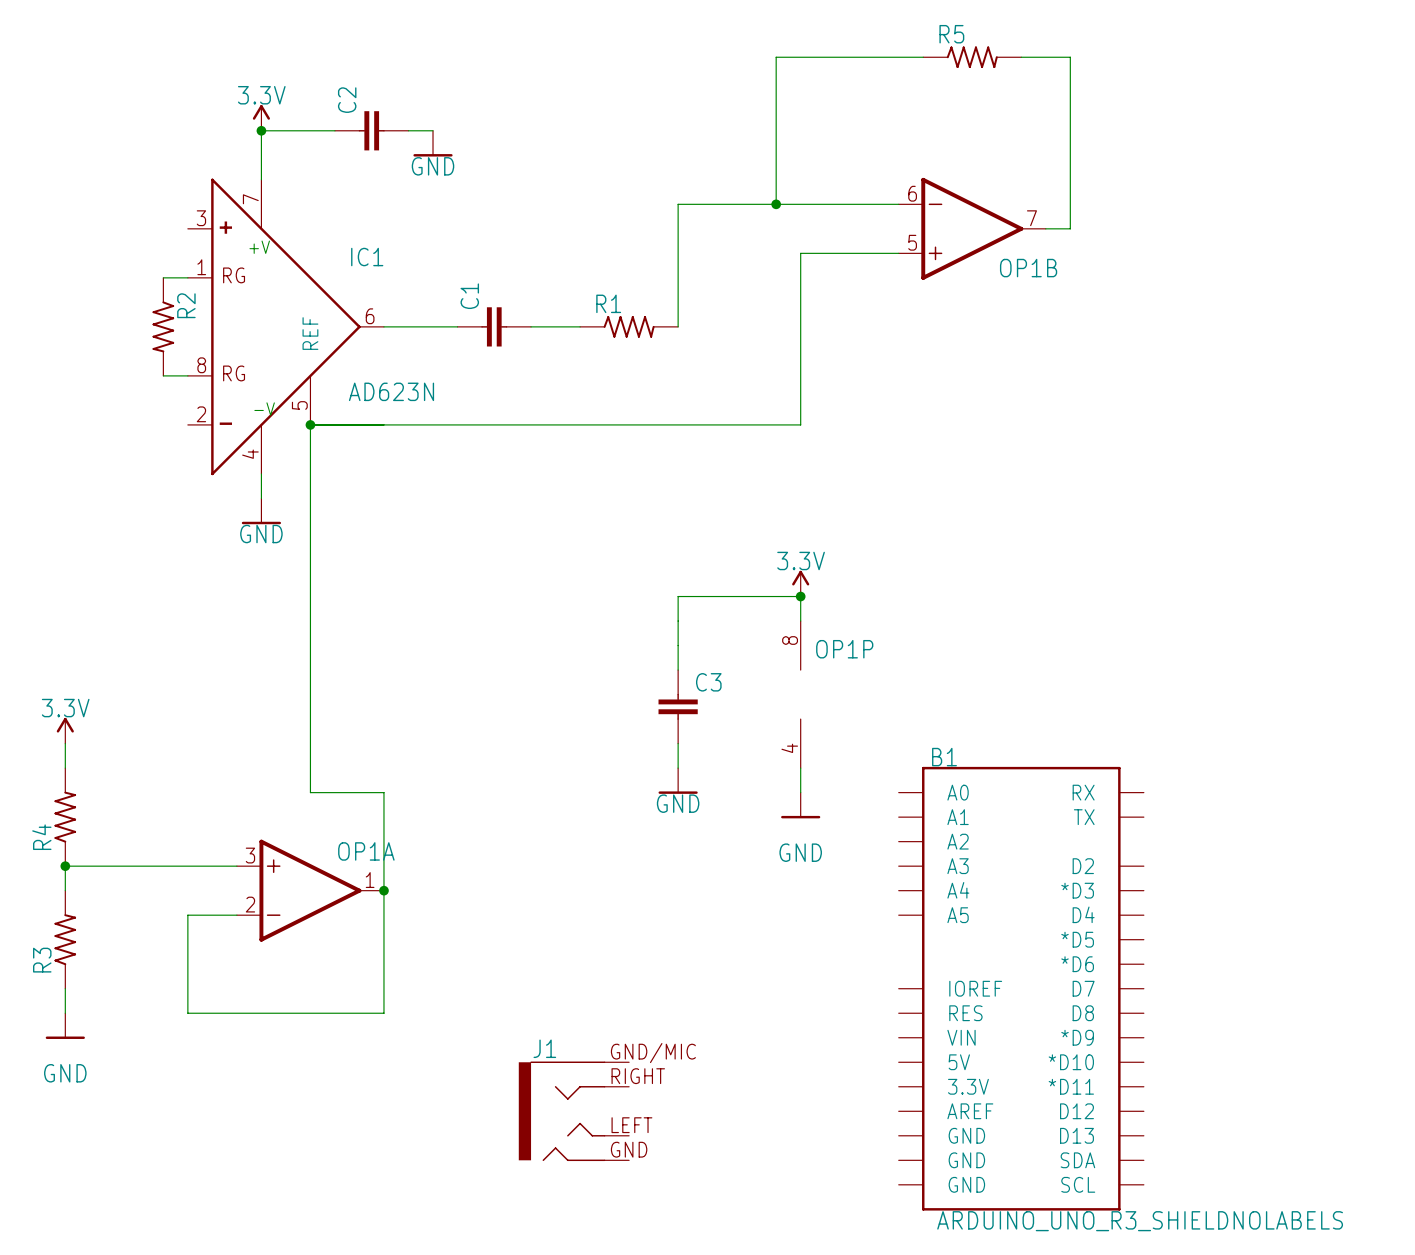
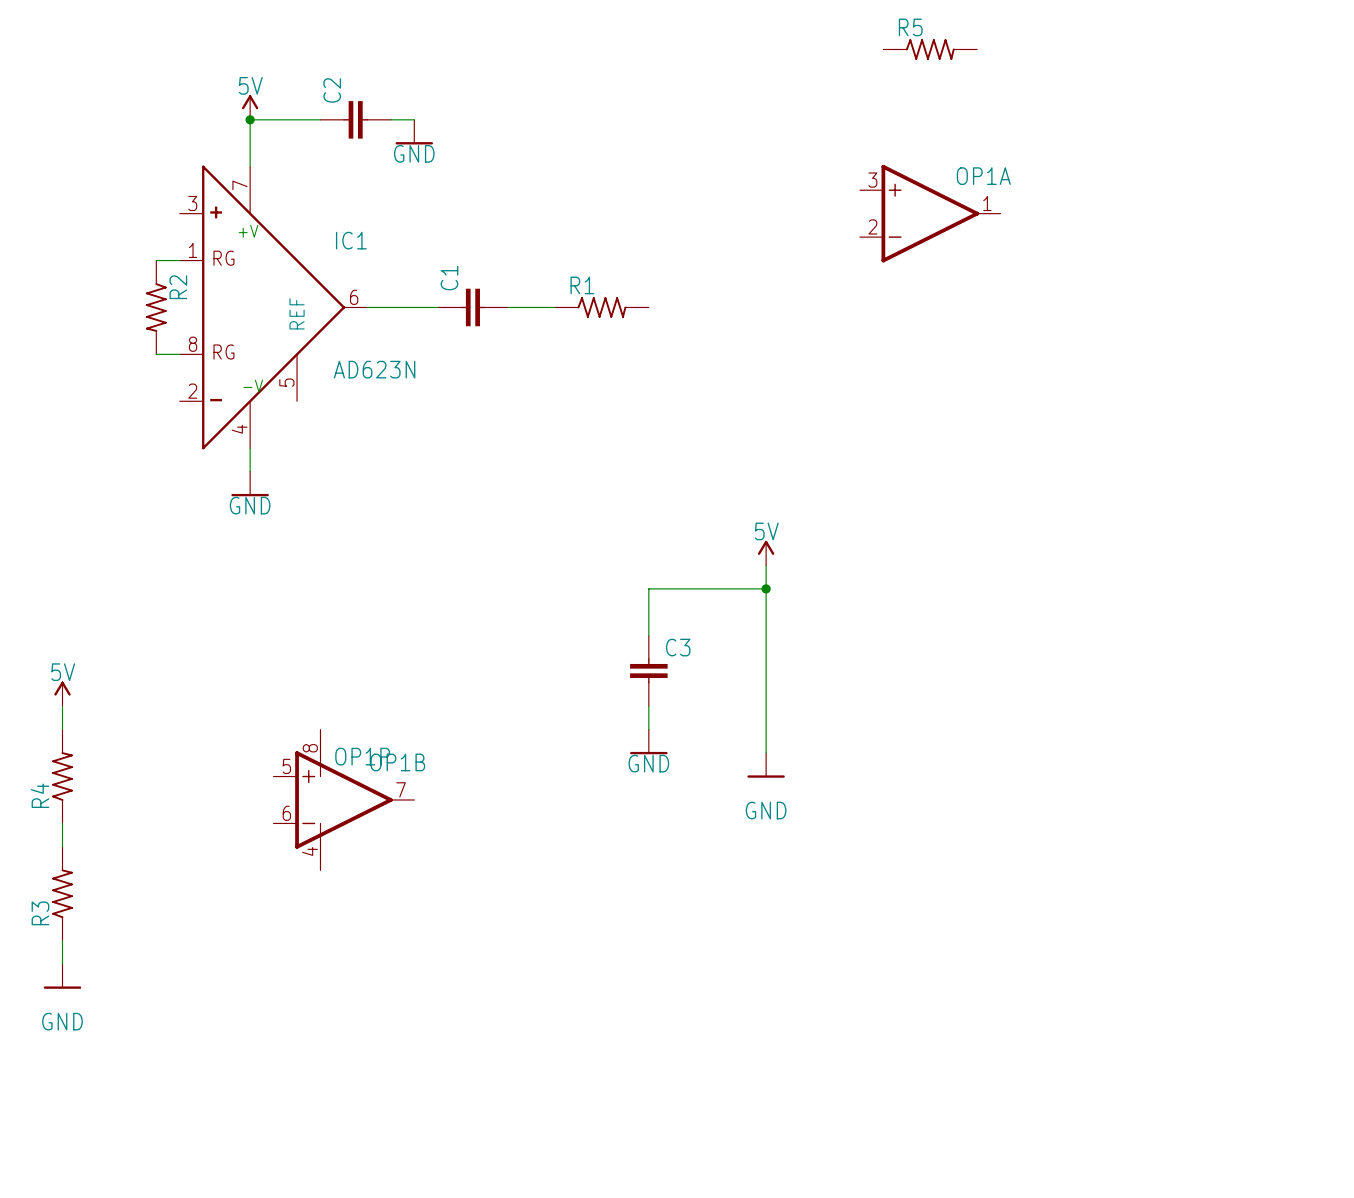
wire: (923, 57) (776, 57) (776, 204) -> none
wire: (1021, 57) (1070, 57) (1070, 228) (1045, 228) -> none
power symbol: 3.3V (261, 117) -> 5V (250, 107)
junction: (776, 204) -> none
wire: (898, 204) (678, 204) (678, 326) -> none
OP1B flip: as is (972, 228) -> up-down (343, 799)
OP1B position: (972, 228) -> (343, 799)
wire: (898, 253) (800, 253) (800, 424) (310, 424) (310, 792) (383, 792) (383, 1013) (187, 1013) (187, 915) (236, 915) -> none
junction: (310, 424) -> none
power symbol: 3.3V (800, 583) -> 5V (766, 553)
wire: (800, 596) (678, 596) (678, 621) -> (766, 729) (766, 588) (648, 588)
junction position: (800, 596) -> (766, 588)
OP1P position: (800, 694) -> (320, 799)
power symbol: 3.3V (65, 730) -> 5V (62, 693)
wire: (65, 866) (236, 866) -> none
junction: (65, 866) -> none
OP1A position: (310, 890) -> (930, 213)
junction: (383, 890) -> none
B1: ARDUINO_UNO_R3_SHIELDNOLABELS (1021, 988) -> none
J1: (573, 1111) -> none

